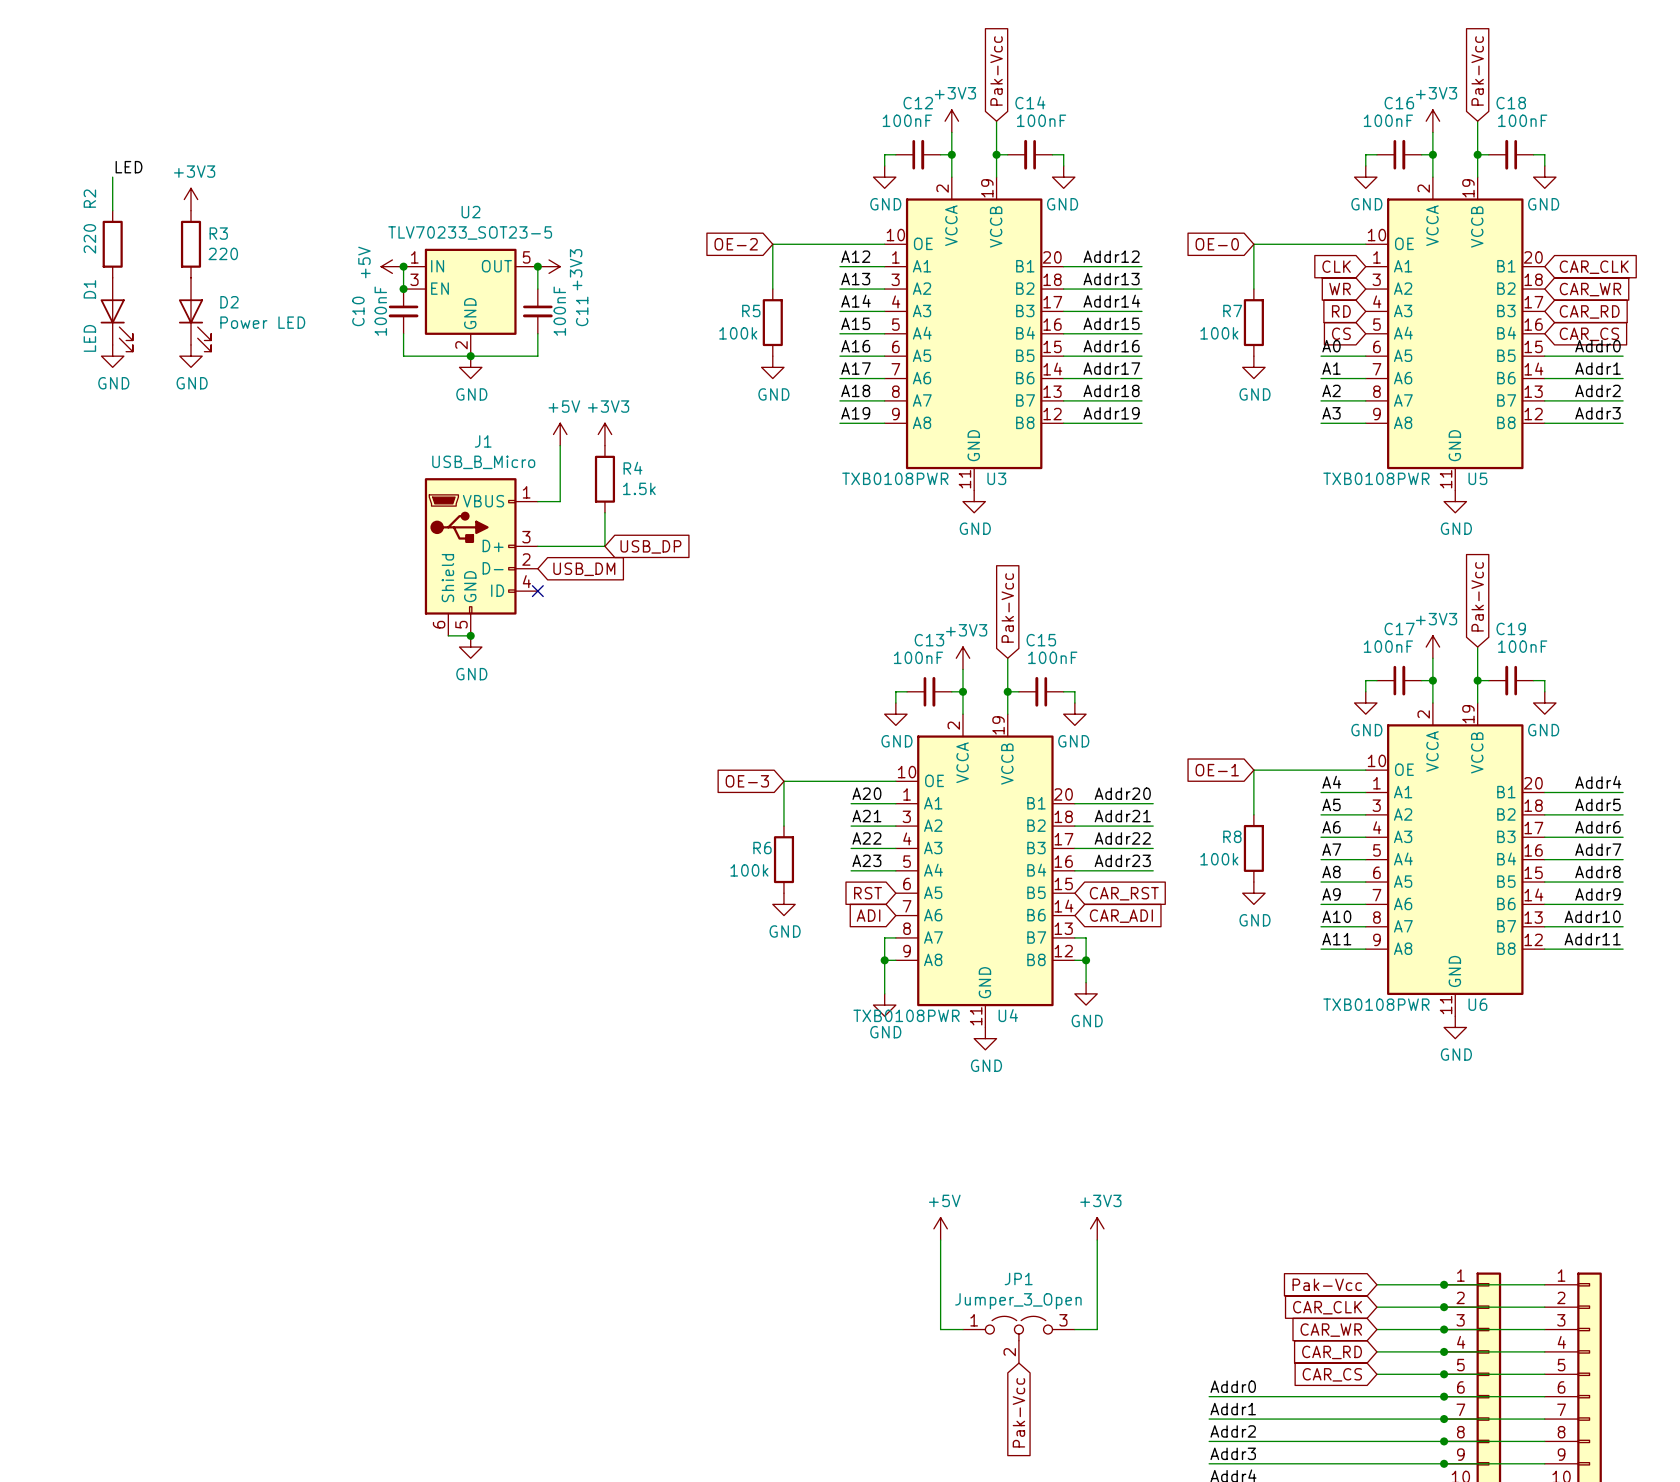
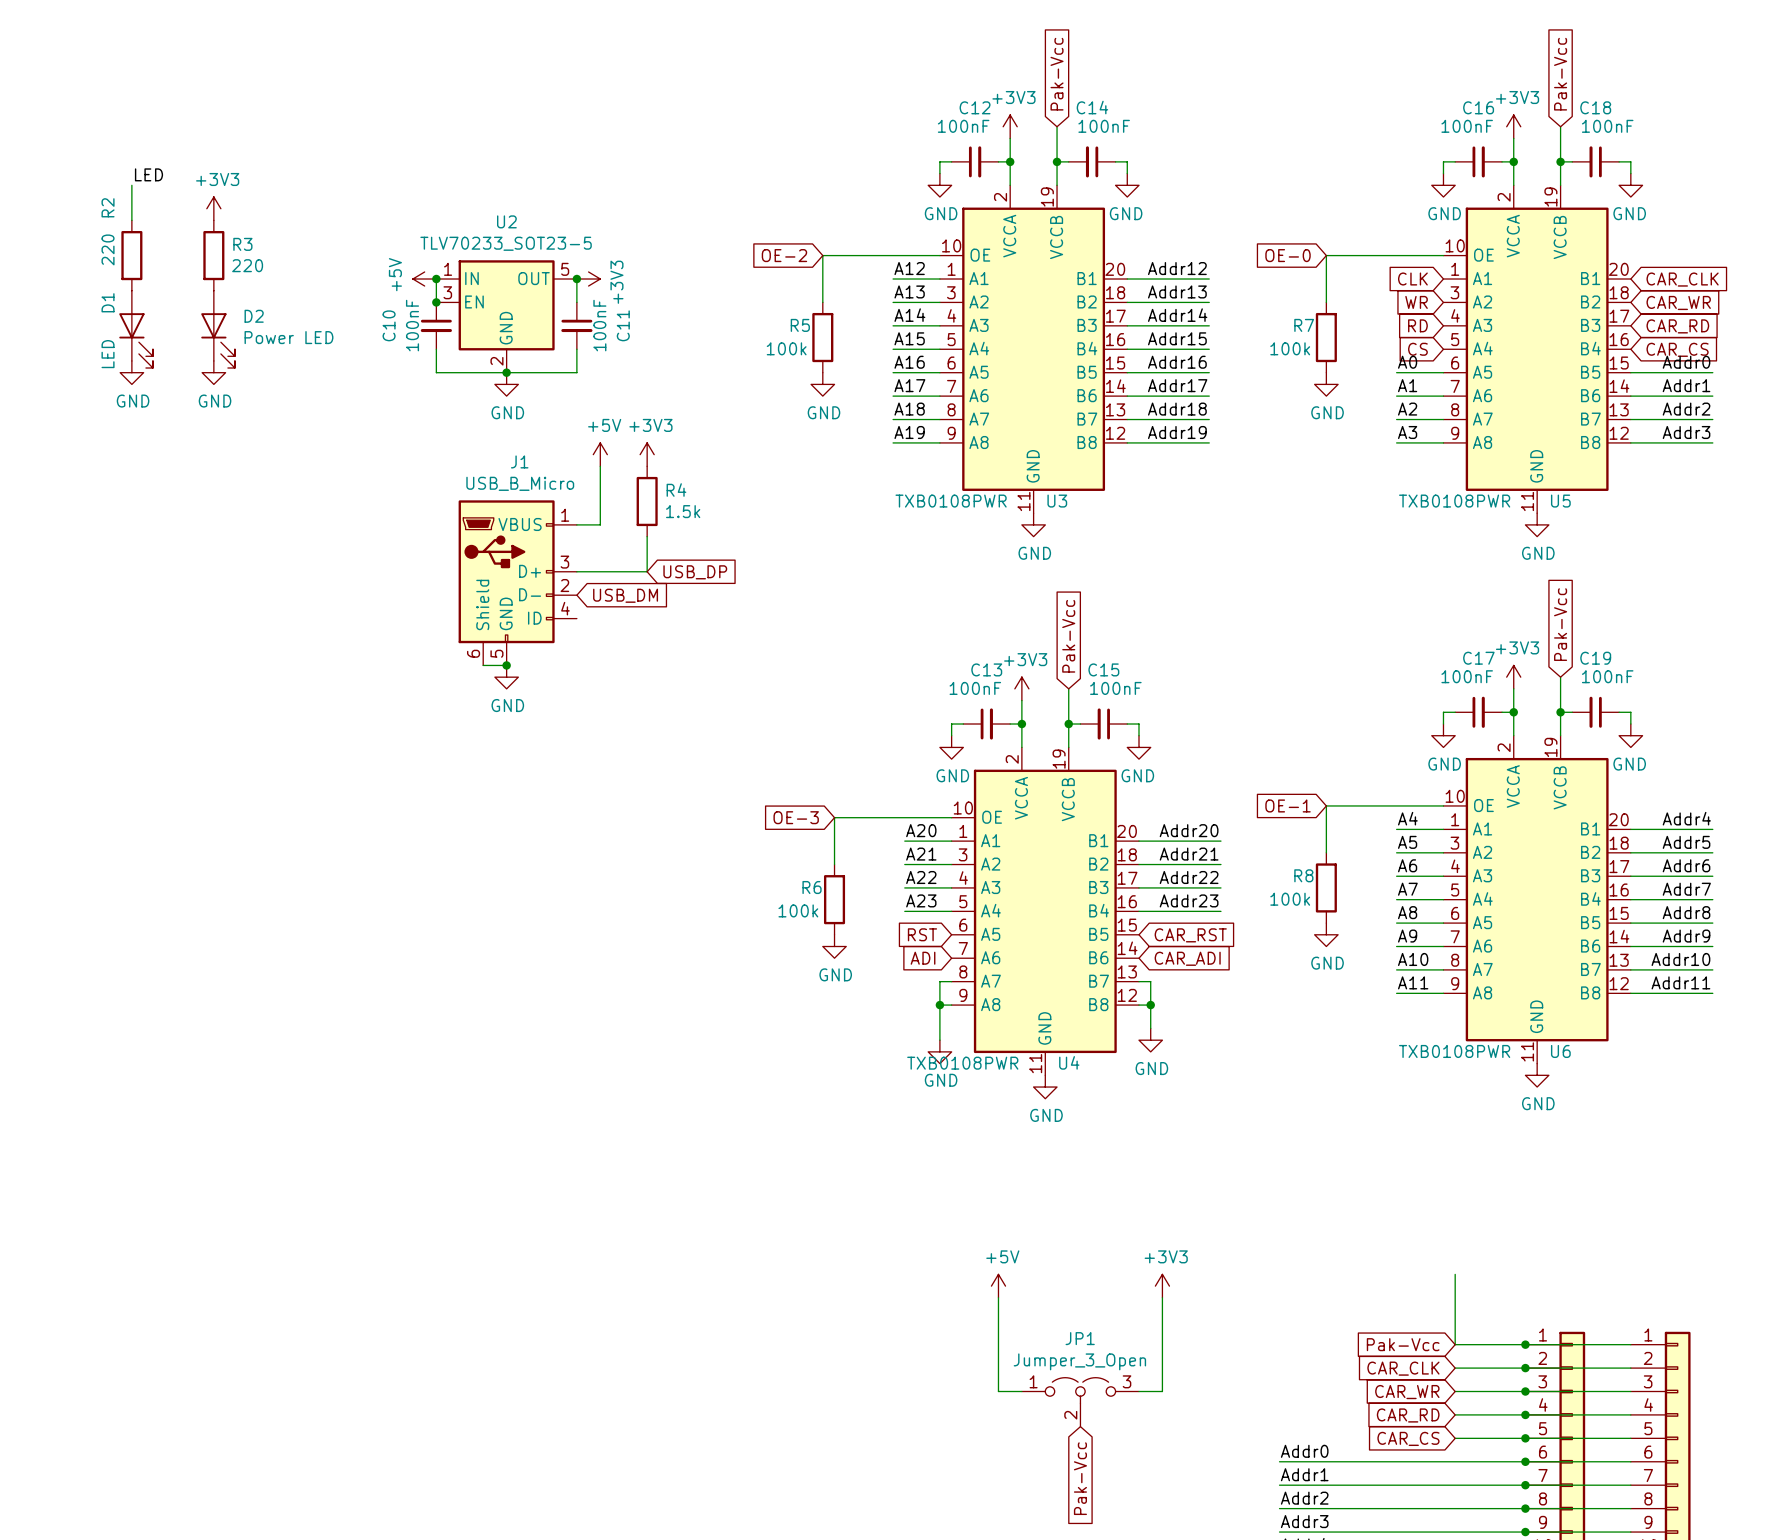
no-connect mark: (537, 591) -> none
wire: none -> (1455, 1274) (1455, 1344)

